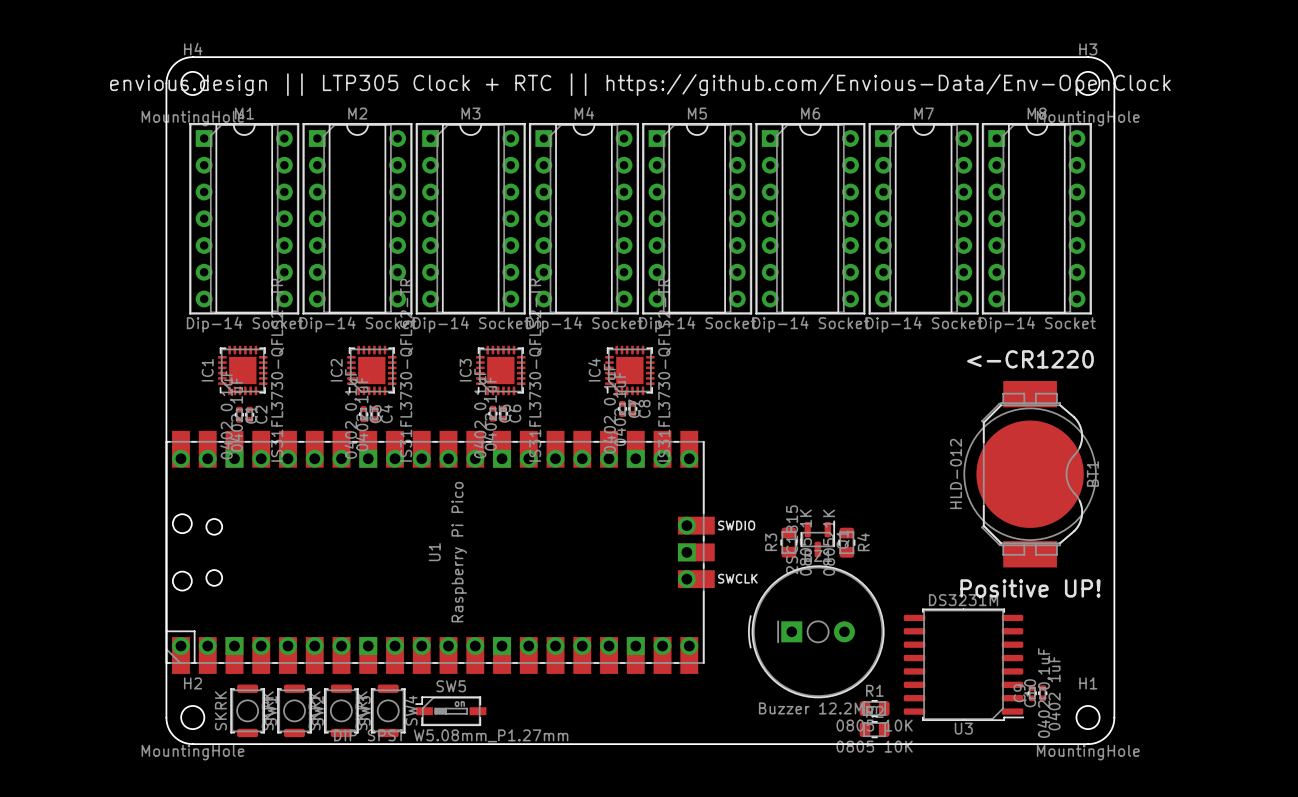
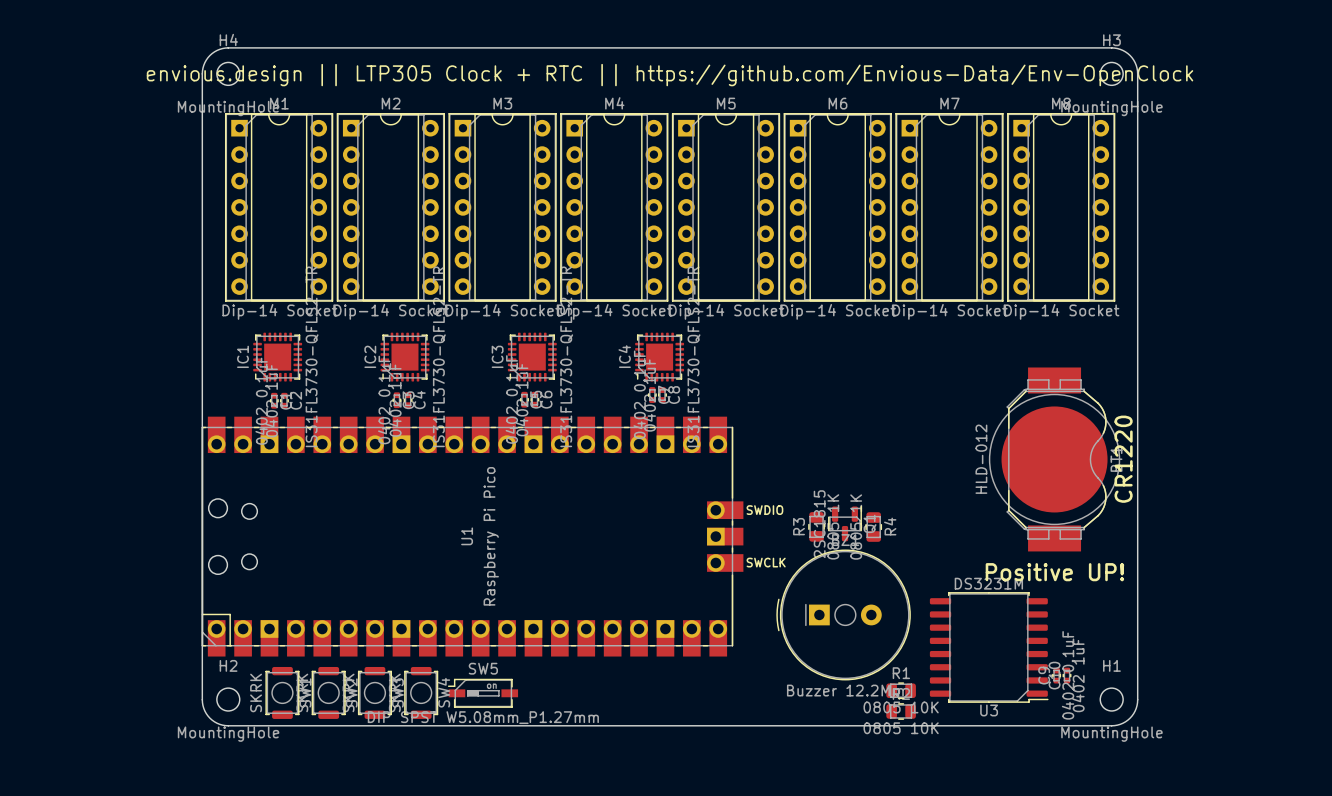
text: <-CR1220 (1030, 359) -> none
text: none -> CR1220 (1123, 459)

